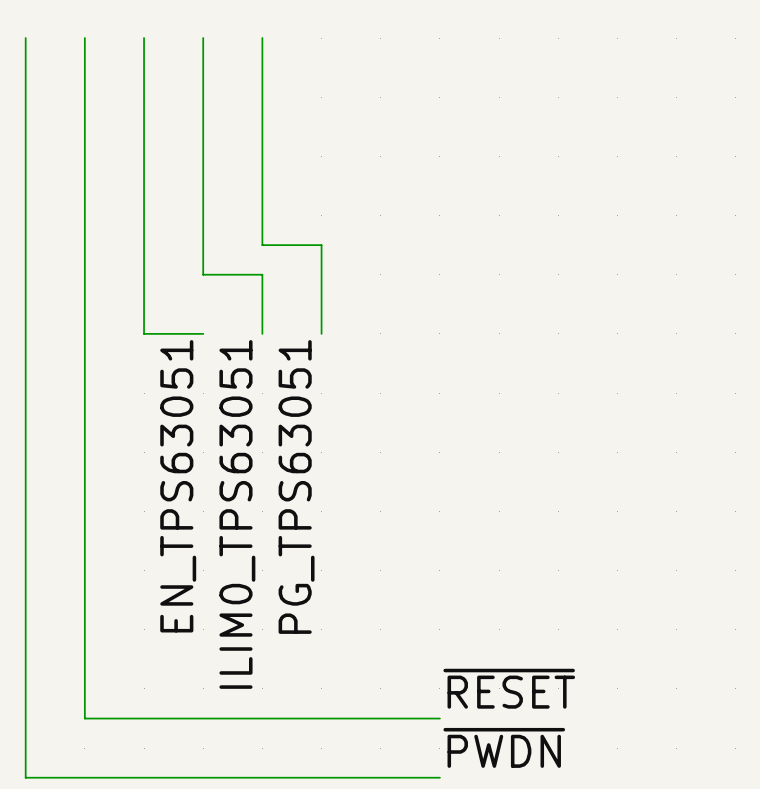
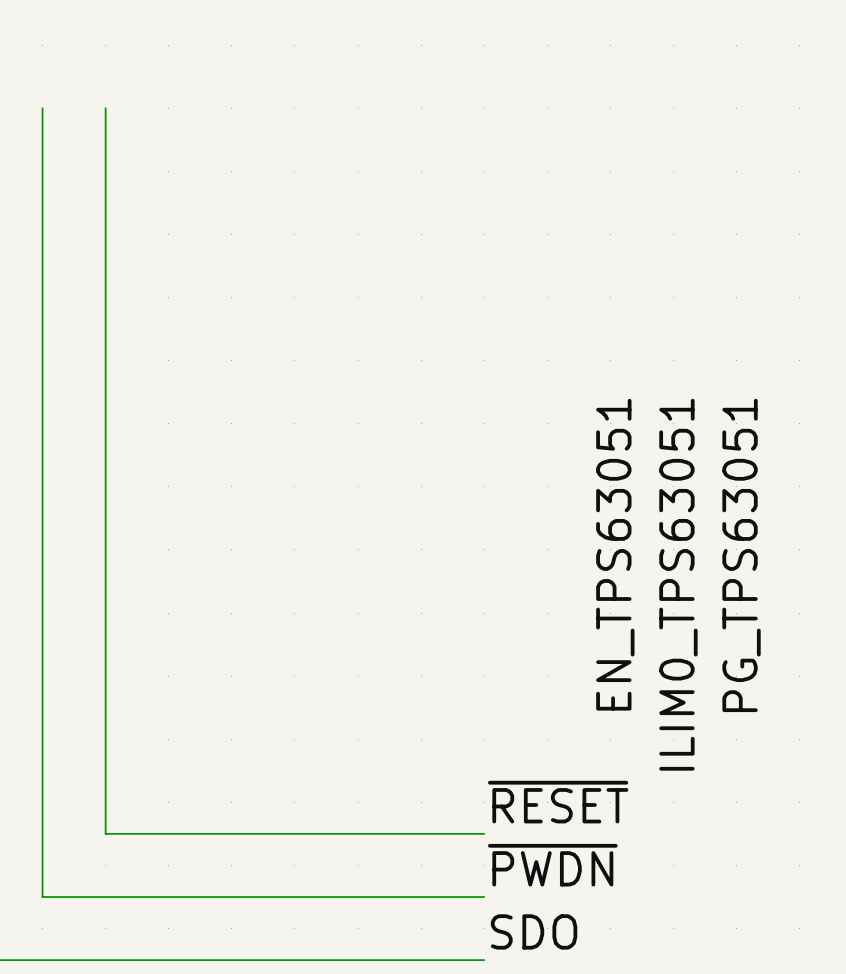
wire: (144, 38) (144, 333) (203, 333) -> none
wire: (203, 38) (203, 274) (262, 274) (262, 333) -> none
wire: (262, 38) (262, 245) (321, 245) (321, 333) -> none
label position: EN_TPS63051 (178, 486) -> EN_TPS63051 (615, 554)
label position: PG_TPS63051 (296, 486) -> PG_TPS63051 (741, 555)
label position: ILIM0_TPS63051 (237, 514) -> ILIM0_TPS63051 (678, 584)

